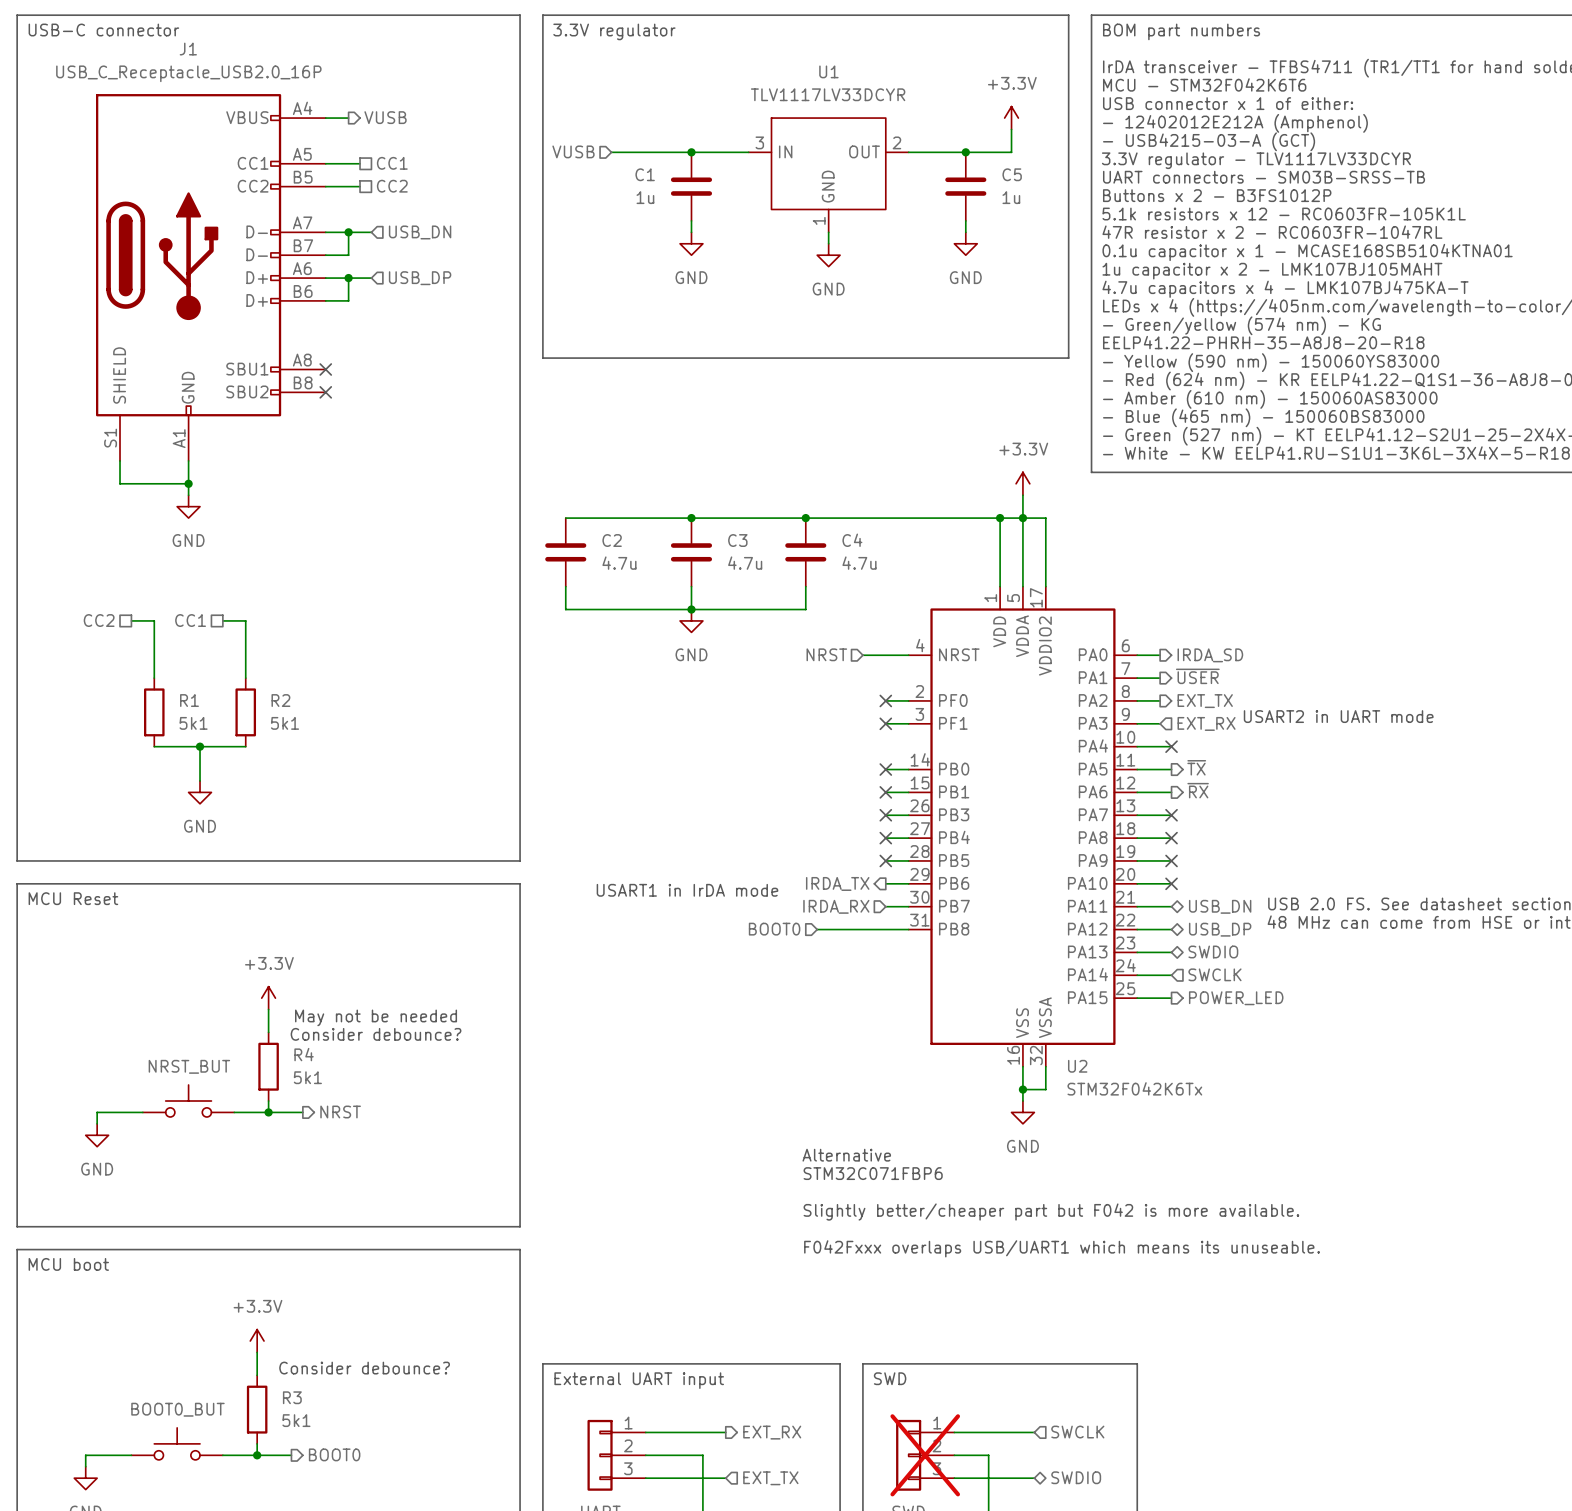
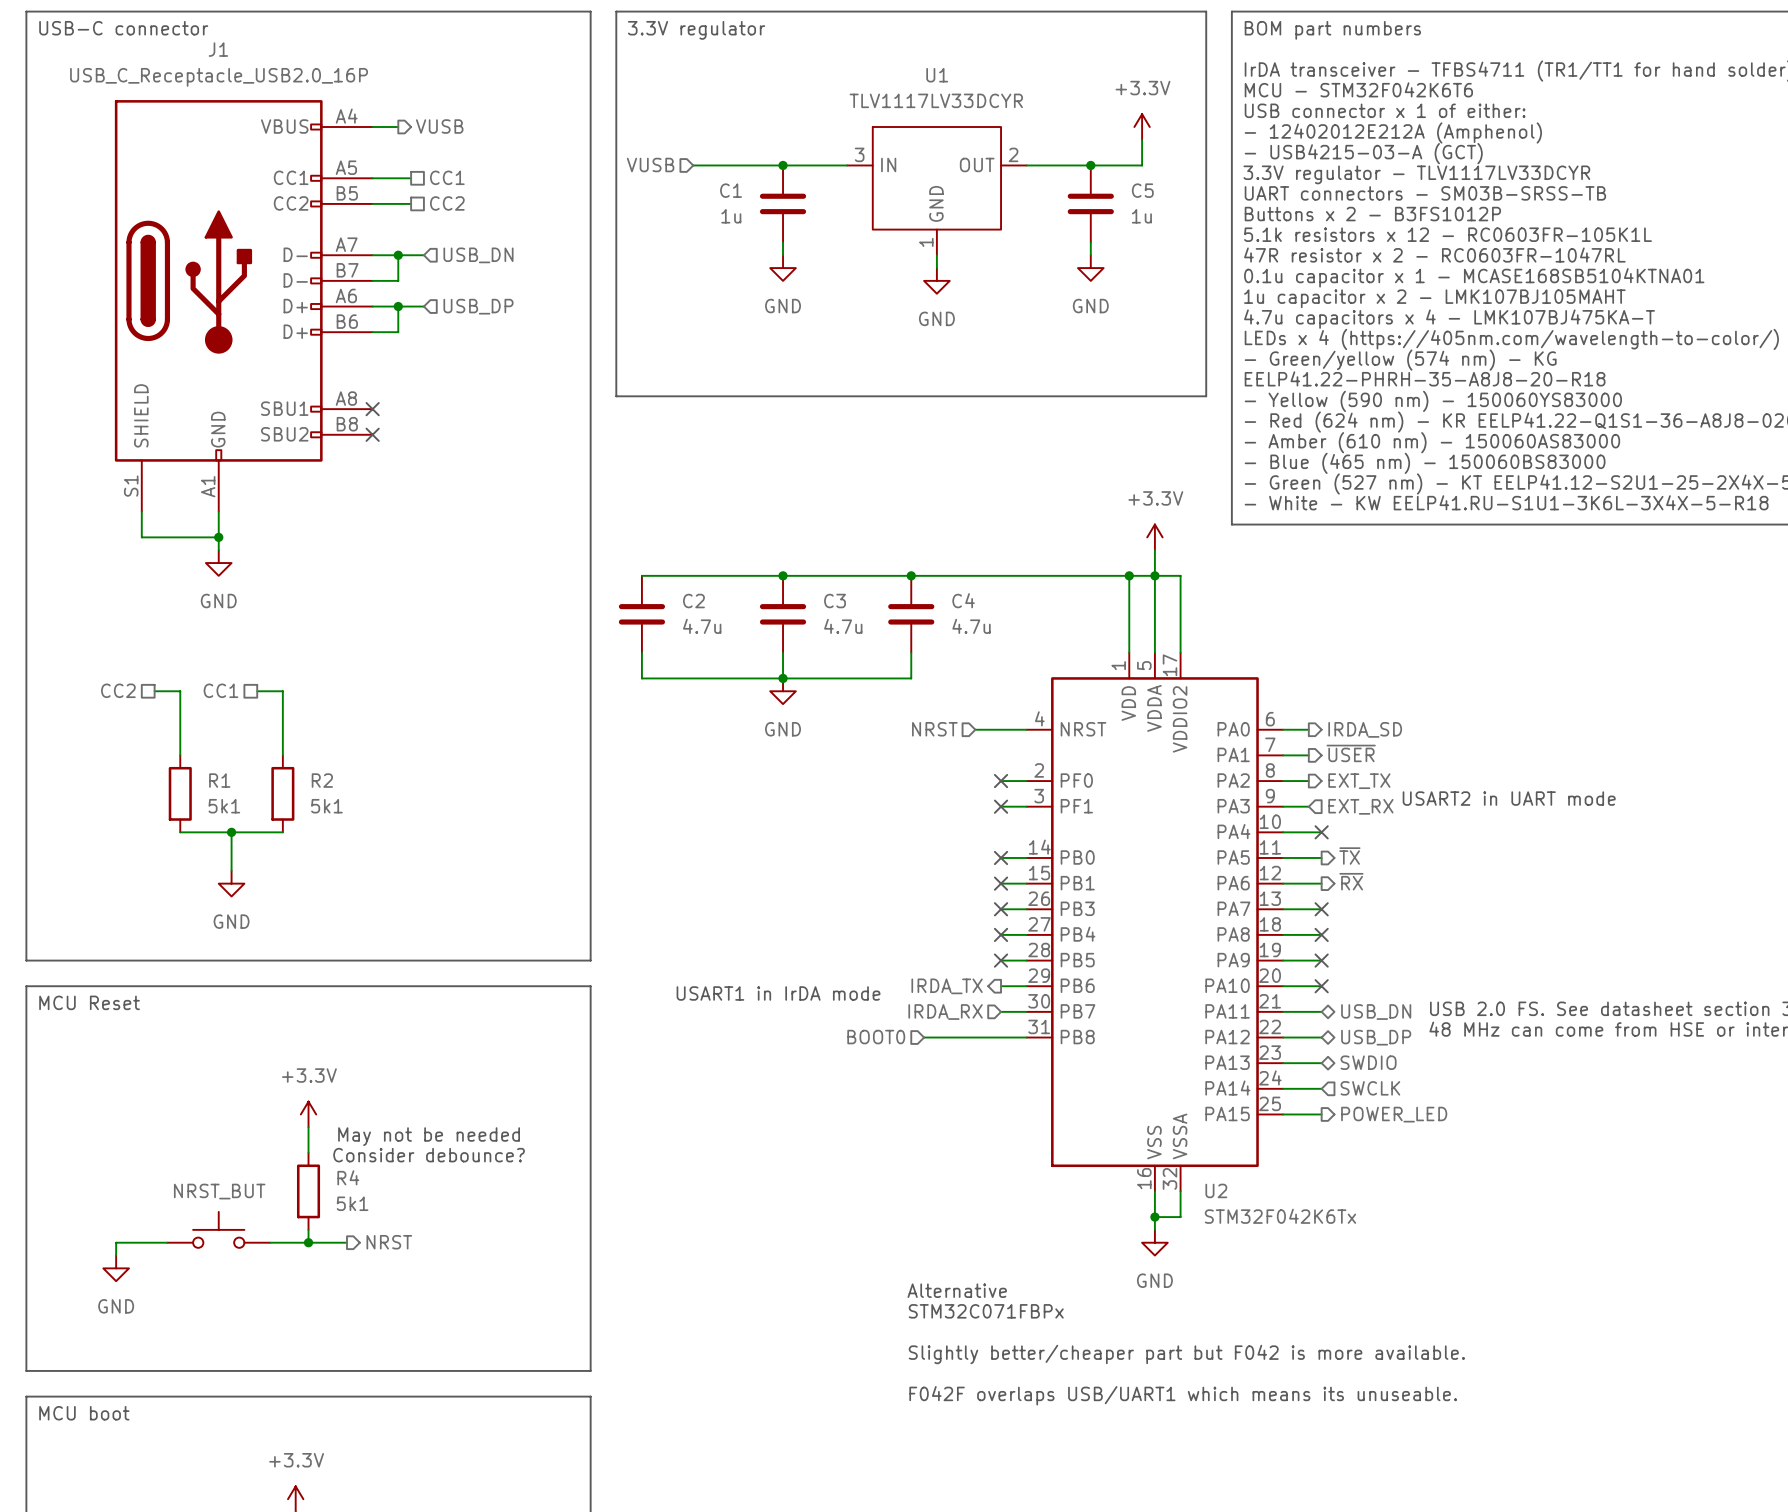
text: STM32C071FBP6 (873, 1173) -> STM32C071FBPx (986, 1311)
text: F042Fxxx overlaps USB/UART1 which means its unuseable. (1062, 1248) -> F042F overlaps USB/UART1 which means its unuseable. (1183, 1395)

